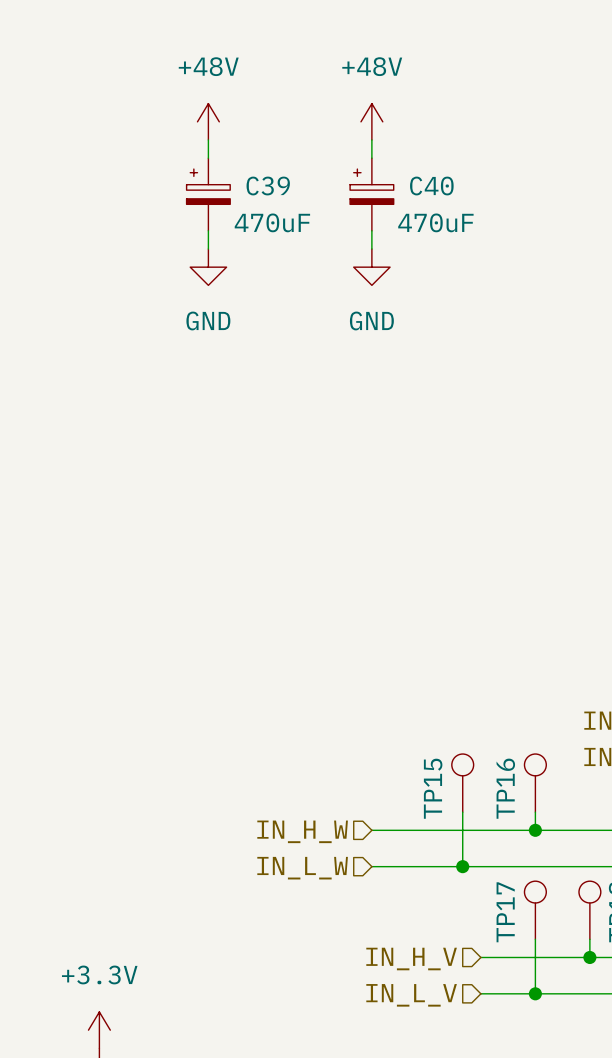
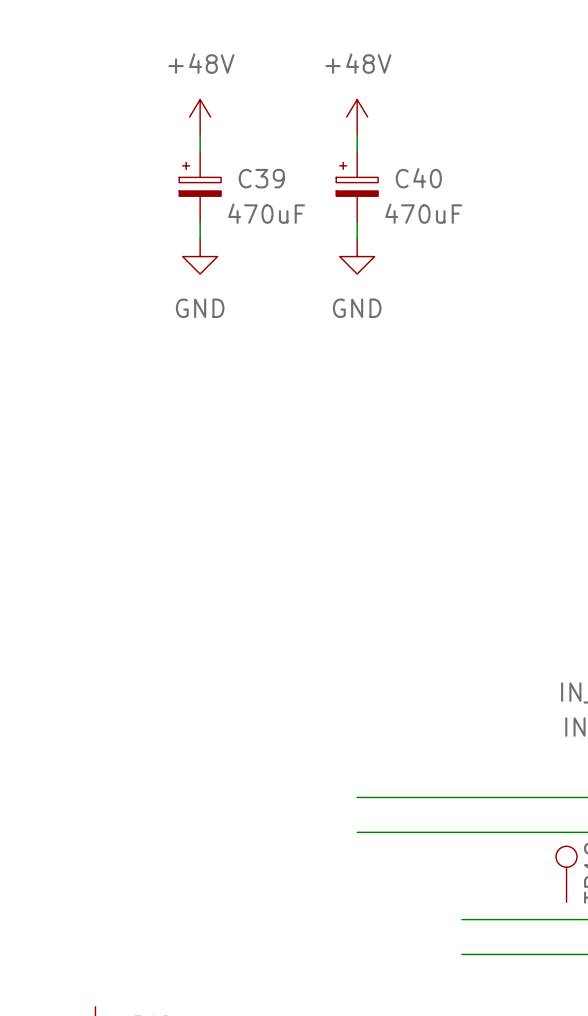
TP15: (462, 783) -> none
TP16: (535, 783) -> none
wire: (462, 812) (462, 866) -> none
wire: (535, 812) (535, 830) -> none
junction: (535, 830) -> none
hierarchical label: IN_H_W (302, 831) -> none
junction: (462, 866) -> none
hierarchical label: IN_L_W (302, 868) -> none
TP17: (535, 910) -> none
wire: (535, 939) (535, 993) -> none
wire: (589, 939) (589, 957) -> none
junction: (589, 957) -> none
hierarchical label: IN_H_V (411, 959) -> none
junction: (535, 993) -> none
hierarchical label: IN_L_V (411, 995) -> none
power symbol: +3.3V (99, 1030) -> none

